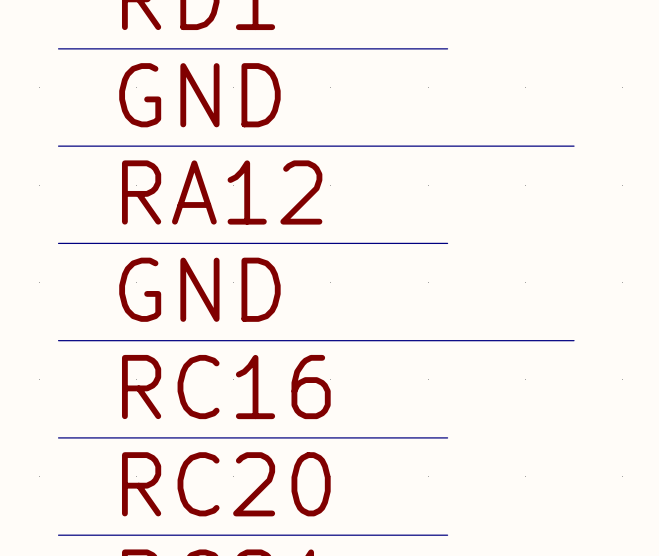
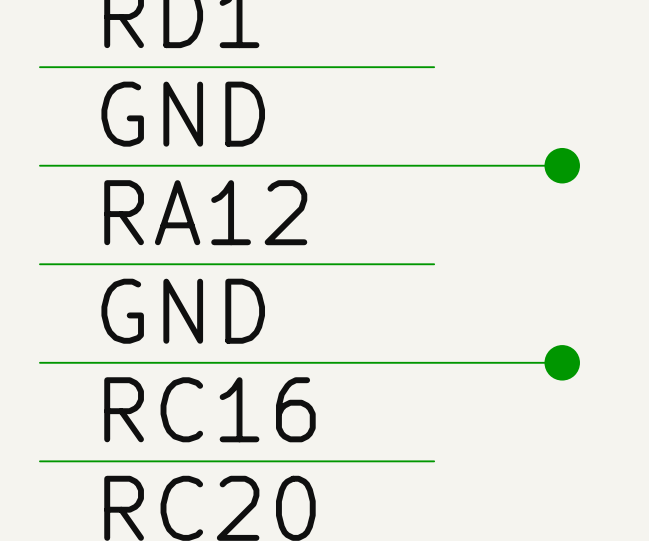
junction: none -> (562, 165)
junction: none -> (562, 362)

